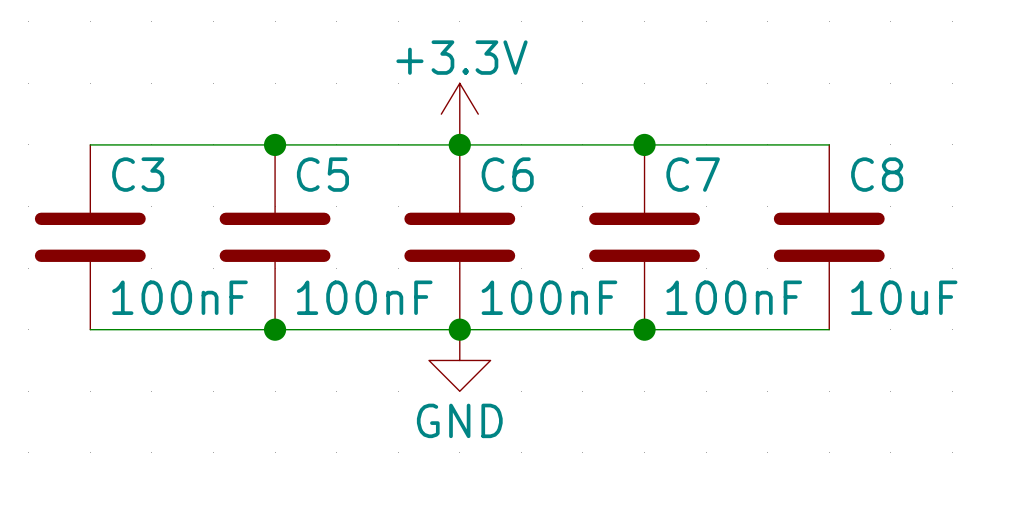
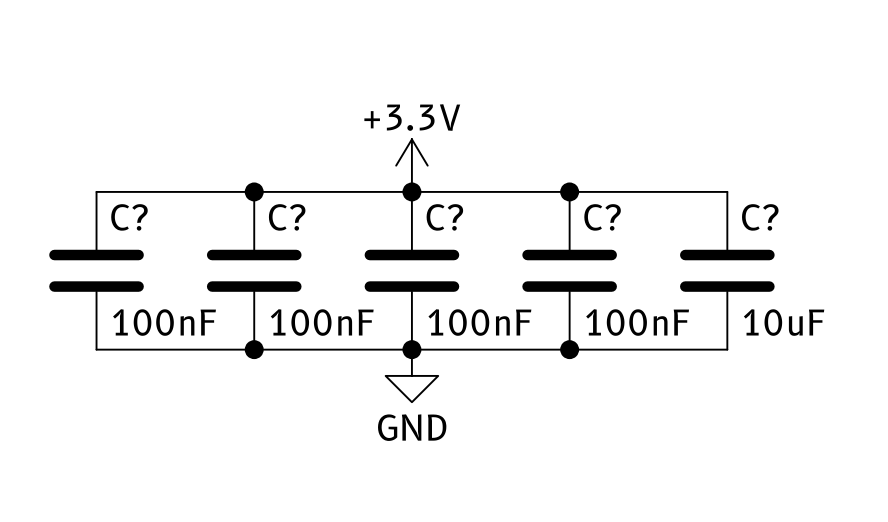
C3 name: C3 (138, 174) -> C? (129, 217)
C5 name: C5 (322, 174) -> C? (287, 217)
C6 name: C6 (507, 174) -> C? (444, 217)
C7 name: C7 (693, 174) -> C? (602, 217)
C8 name: C8 (877, 174) -> C? (760, 217)

